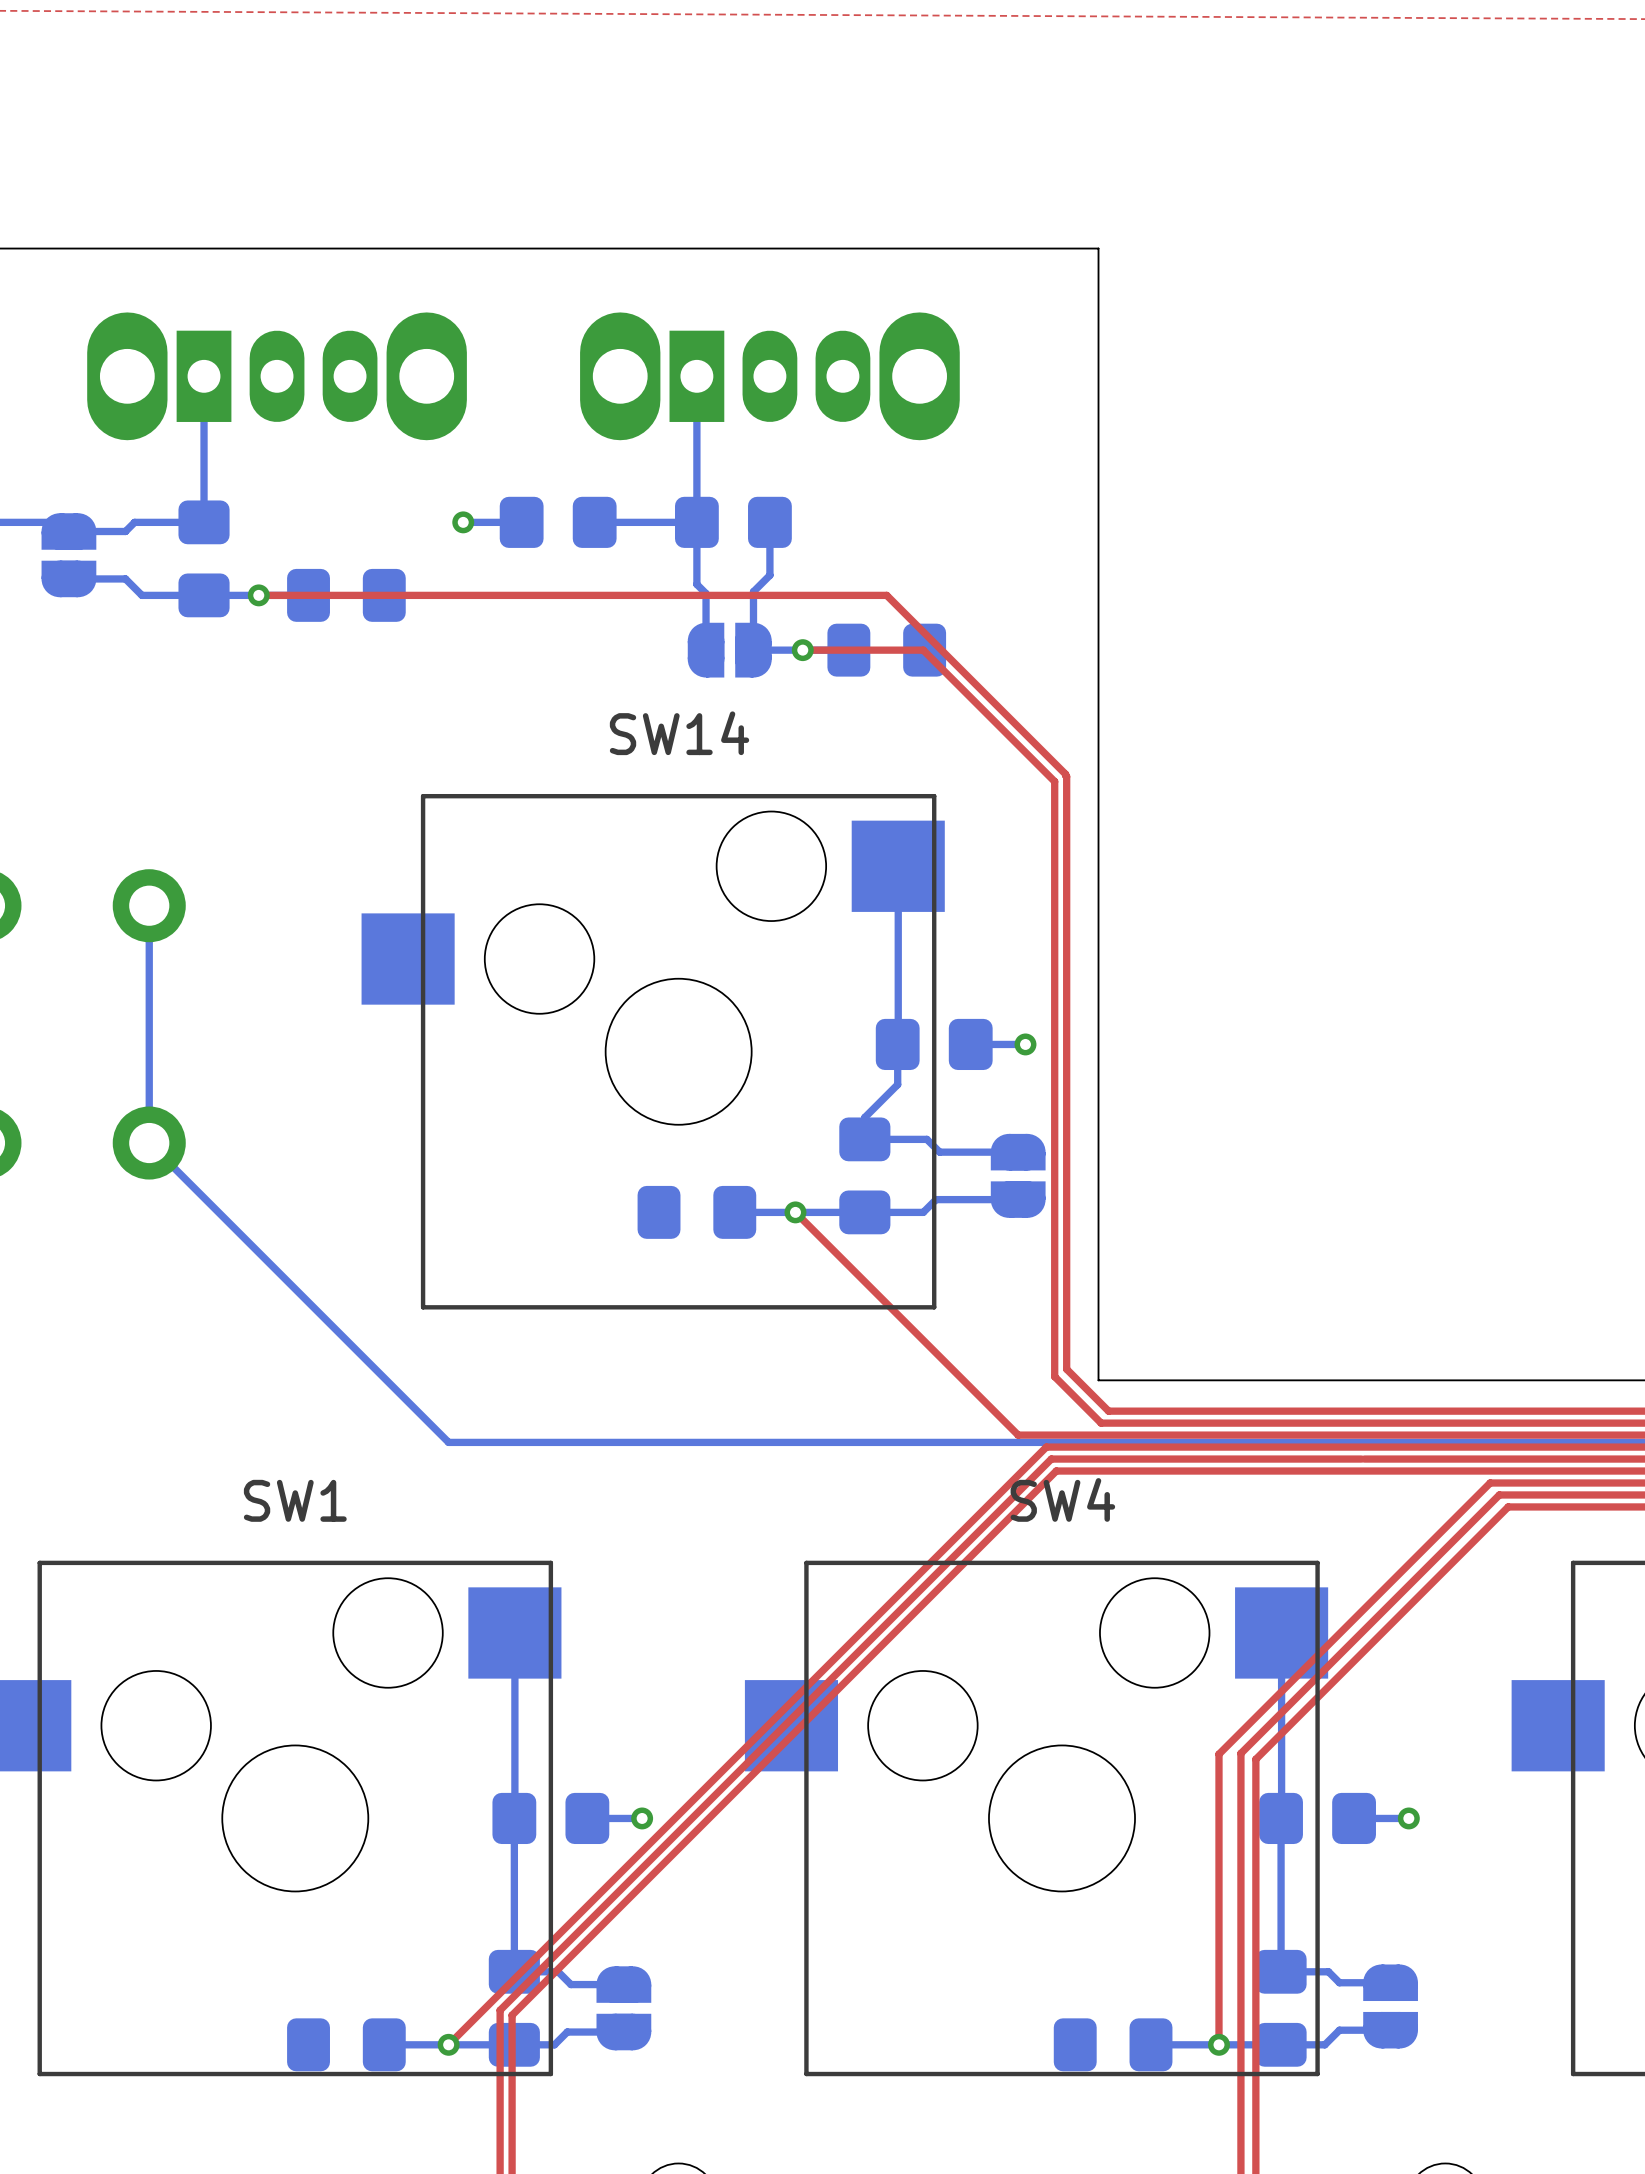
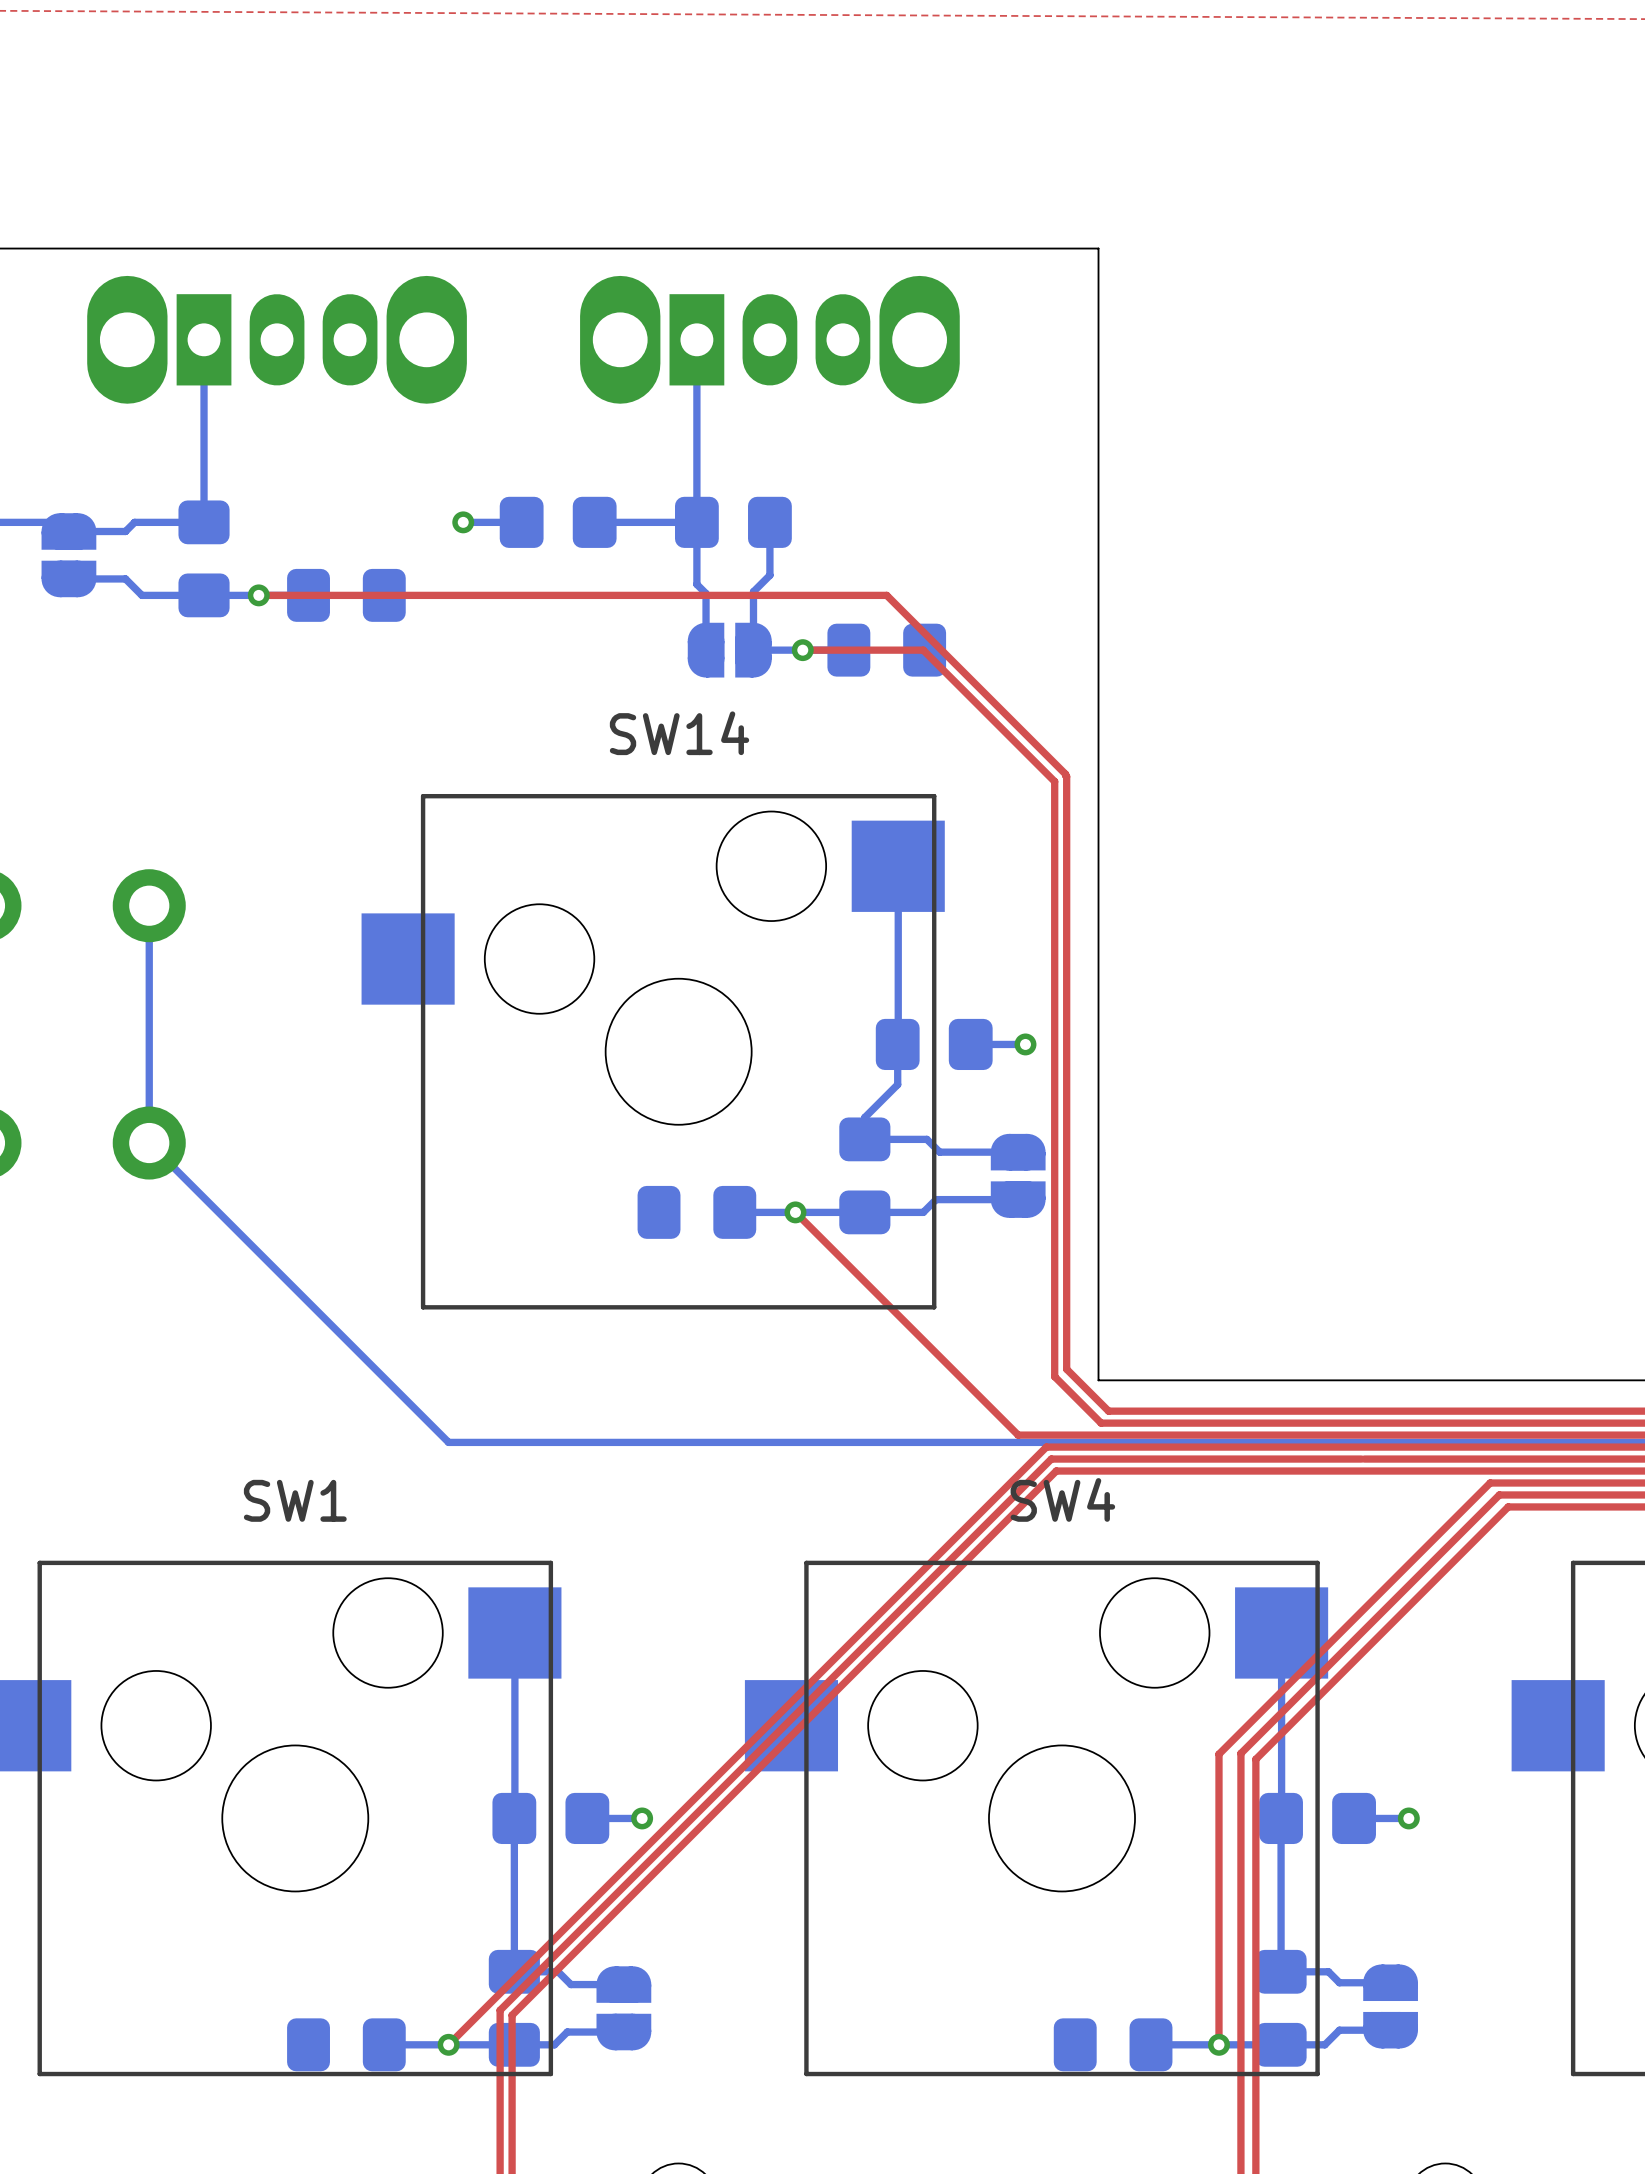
part position: (277, 376) -> (277, 339)
part position: (769, 376) -> (769, 339)

